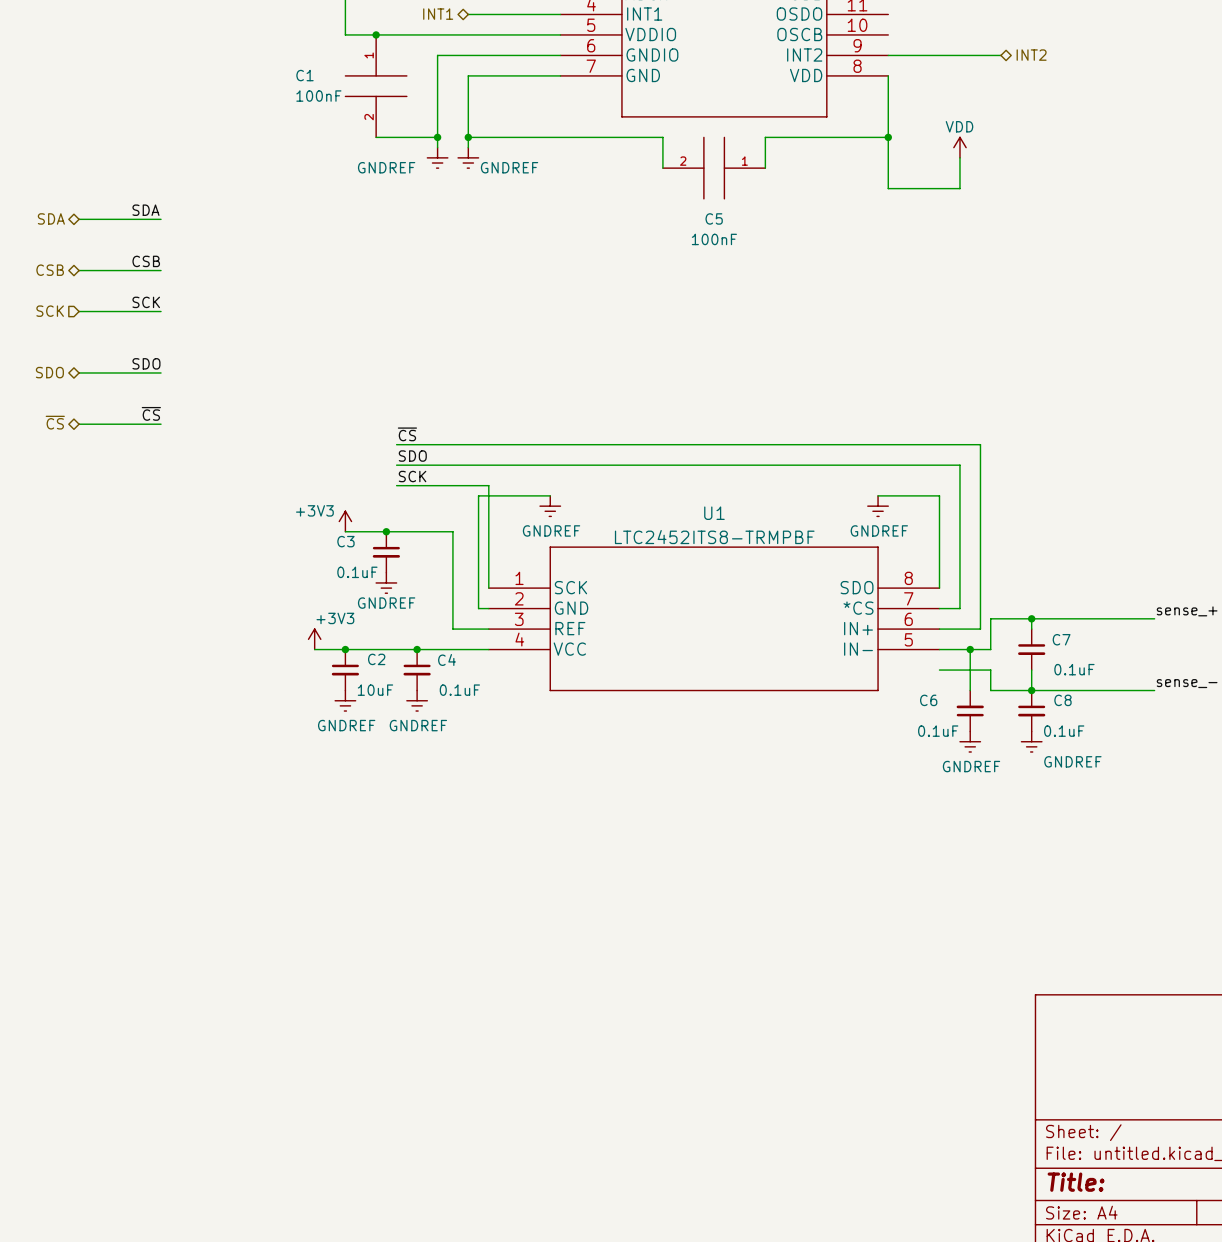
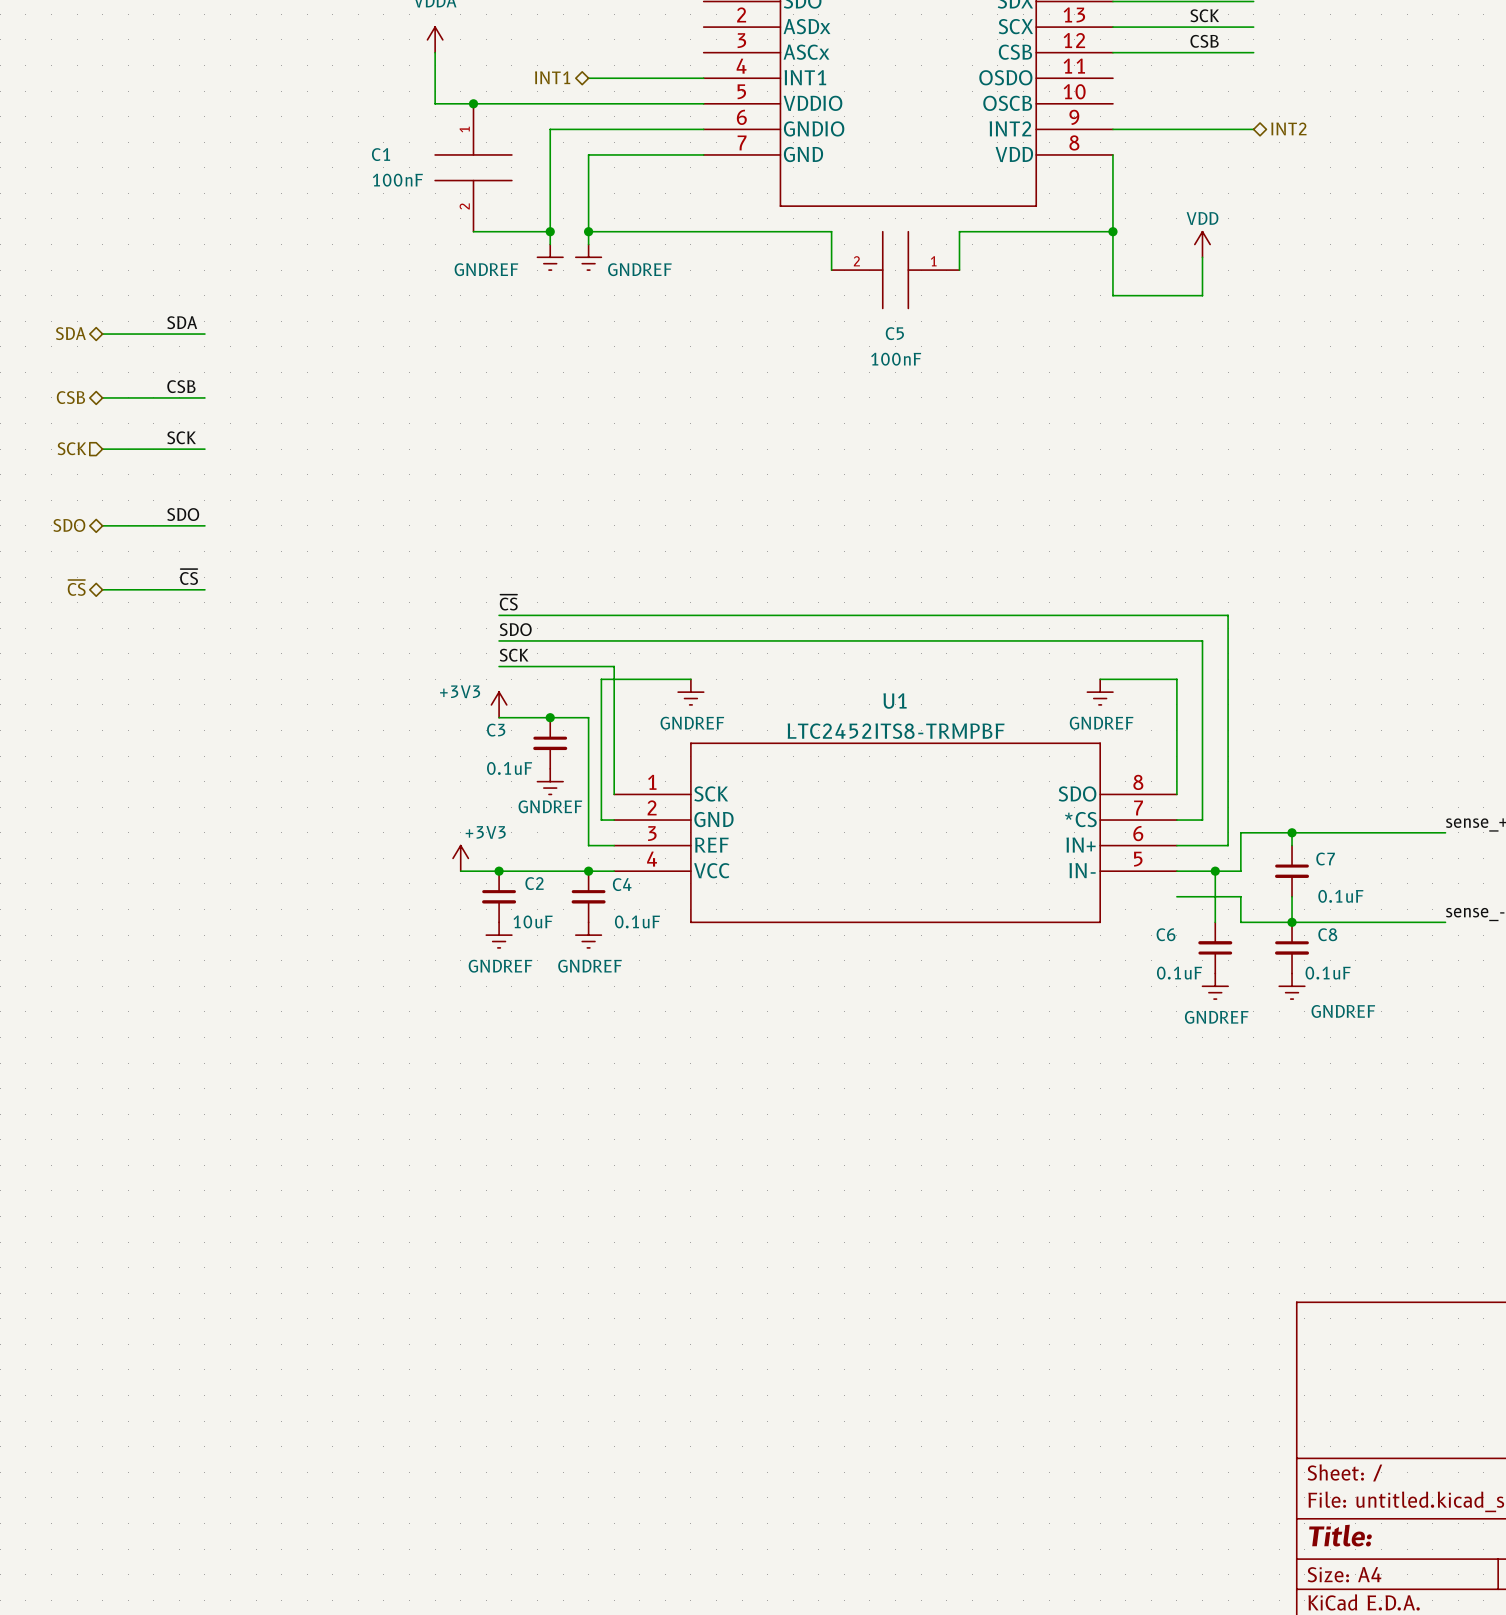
power symbol position: +3V3 (345, 521) -> +3V3 (499, 704)
junction: none -> (550, 717)
wire: (345, 531) (452, 531) (452, 629) (468, 629) -> (499, 717) (588, 717) (588, 845)
junction: (386, 531) -> none
C3 position: (386, 552) -> (550, 743)
power symbol position: GNDREF (386, 582) -> GNDREF (550, 781)
power symbol position: +3V3 (314, 639) -> +3V3 (460, 858)
wire: (314, 649) (365, 649) -> none
junction: (345, 649) -> none
junction position: (417, 649) -> (499, 871)
junction: none -> (588, 871)
C2 position: (345, 670) -> (499, 896)
C4 position: (417, 670) -> (588, 896)
power symbol: GNDREF (345, 700) -> none
power symbol position: GNDREF (417, 700) -> GNDREF (499, 935)
power symbol: none -> GNDREF (588, 935)

